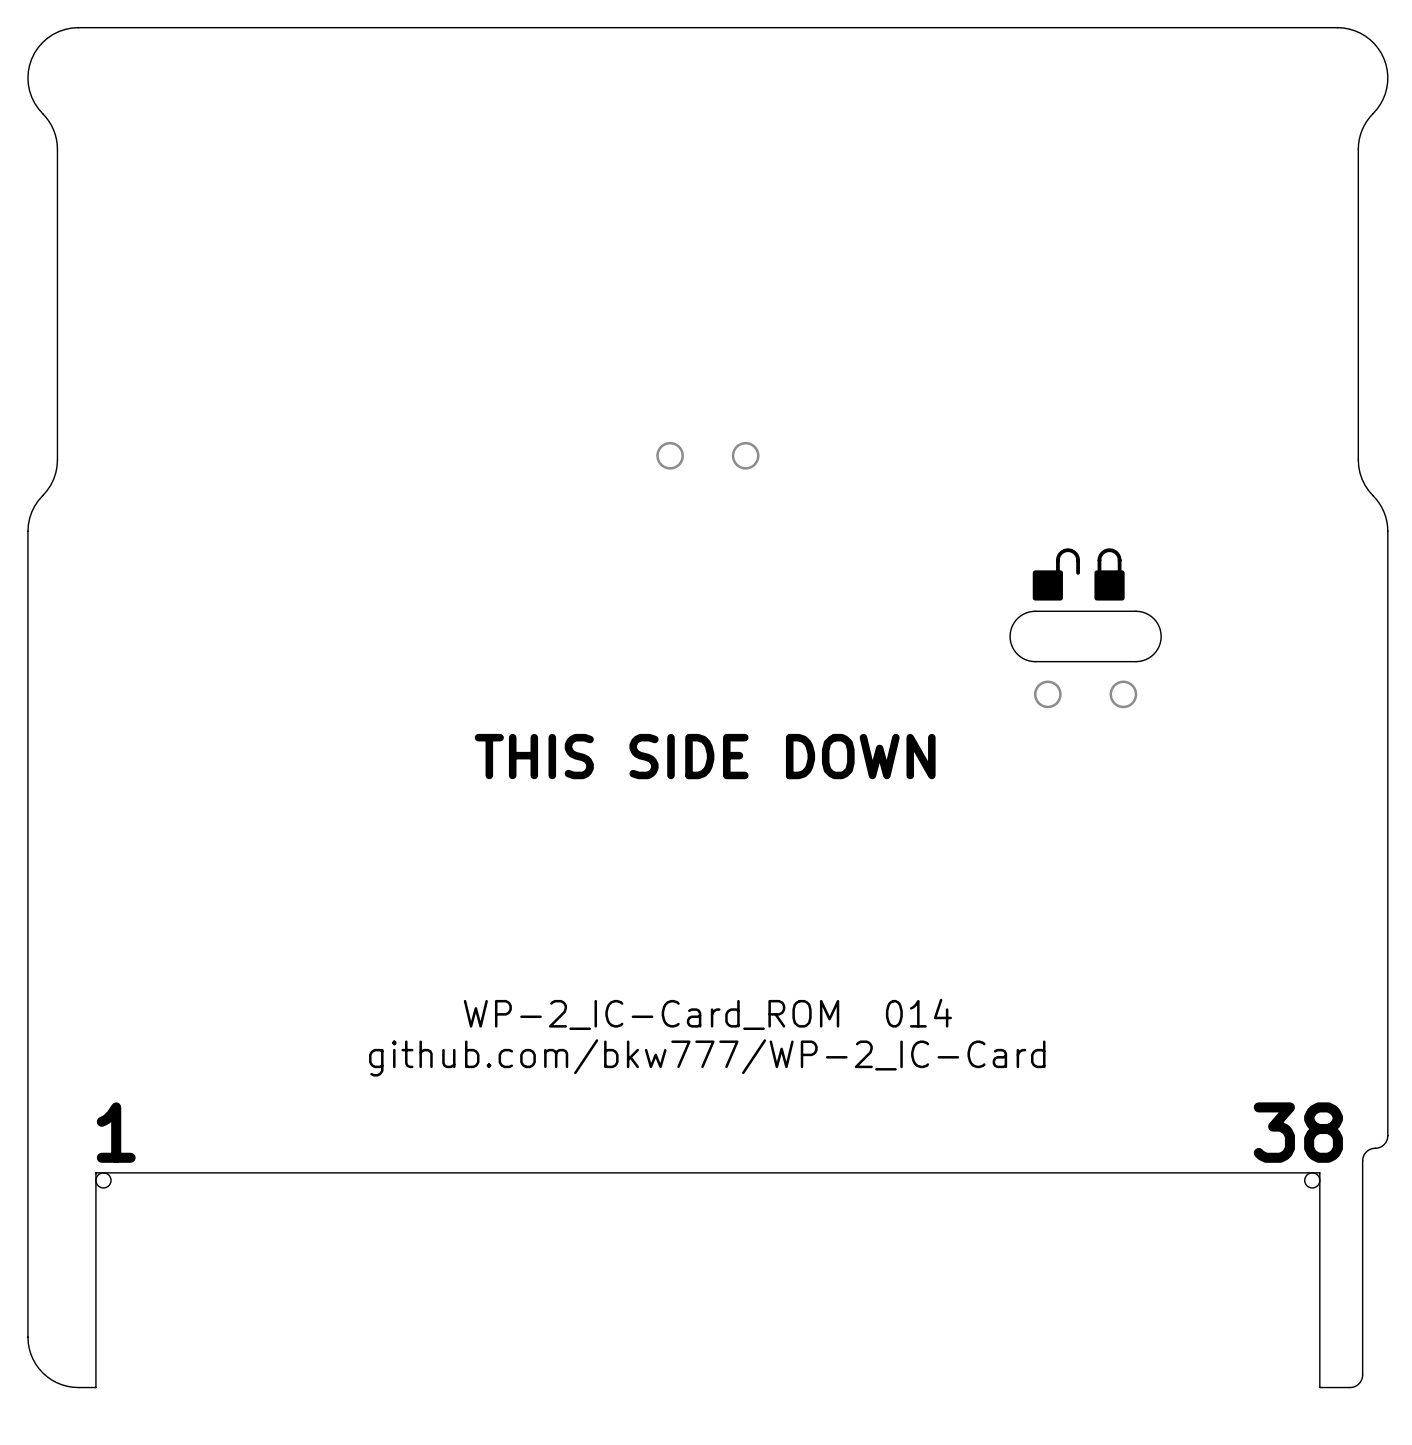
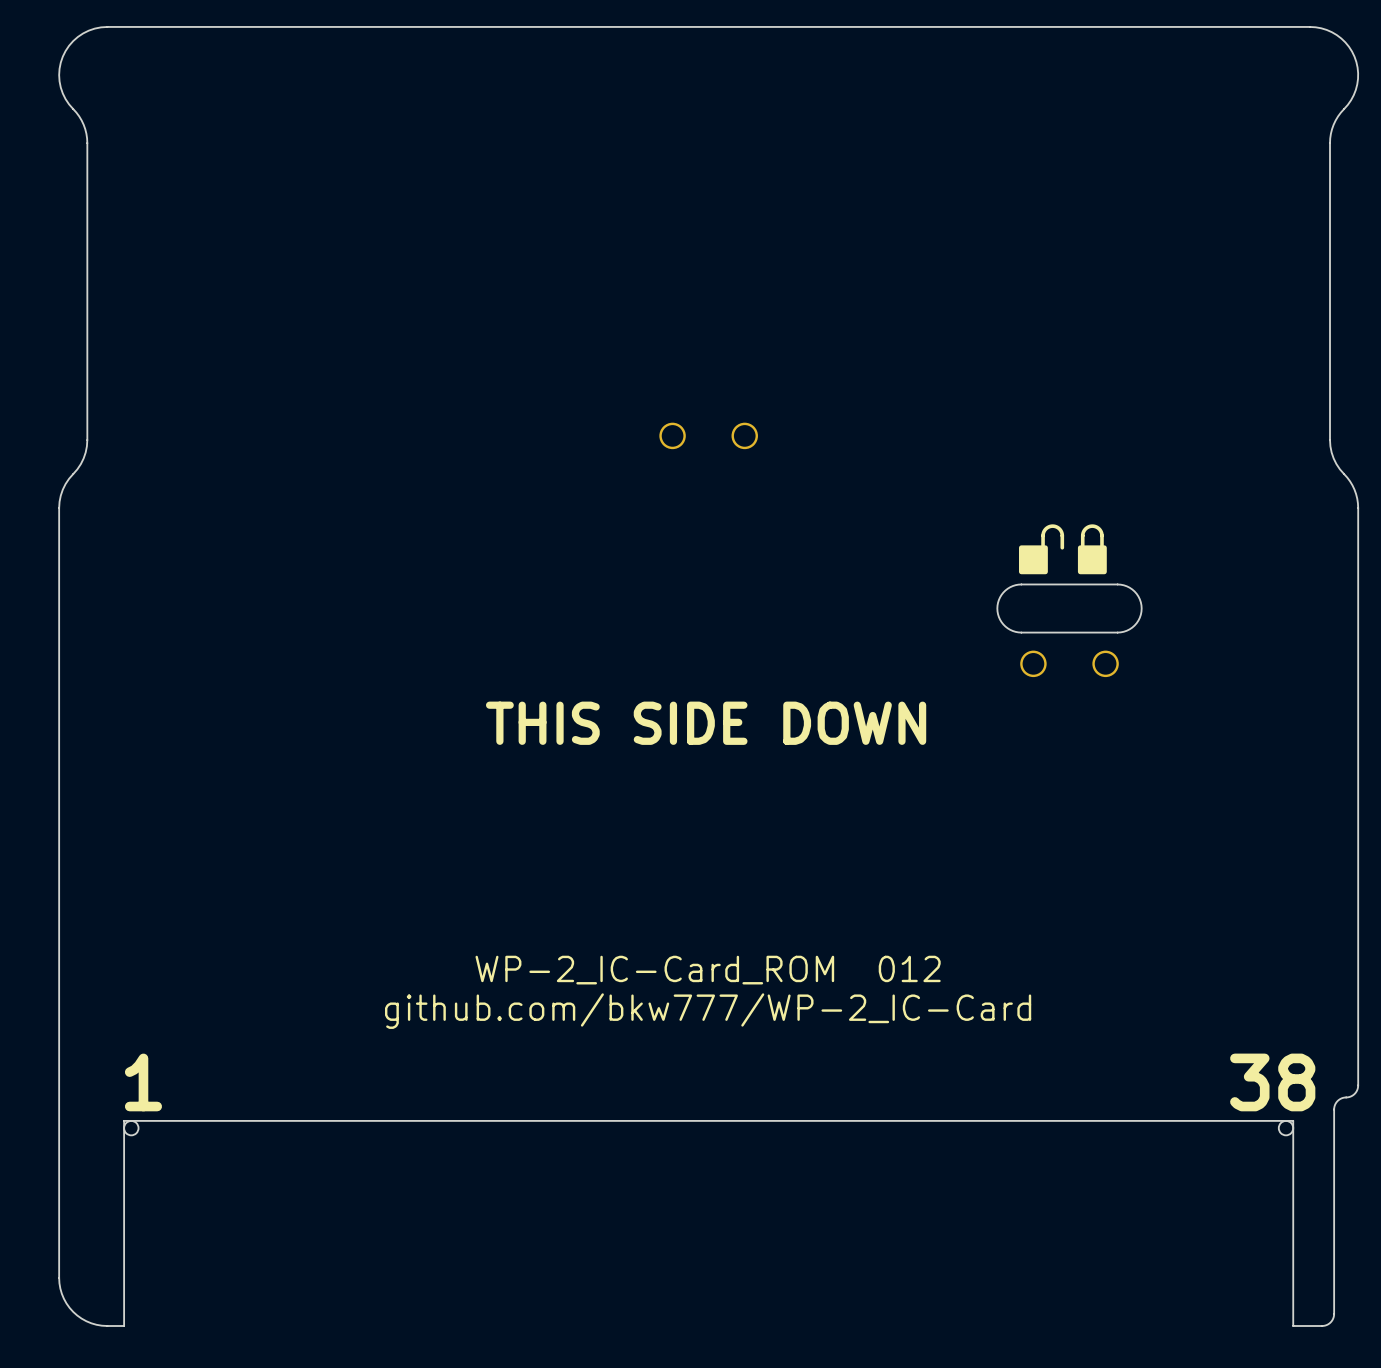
text: WP-2_IC-Card_ROM 014 (707, 1014) -> WP-2_IC-Card_ROM 012 (708, 970)

